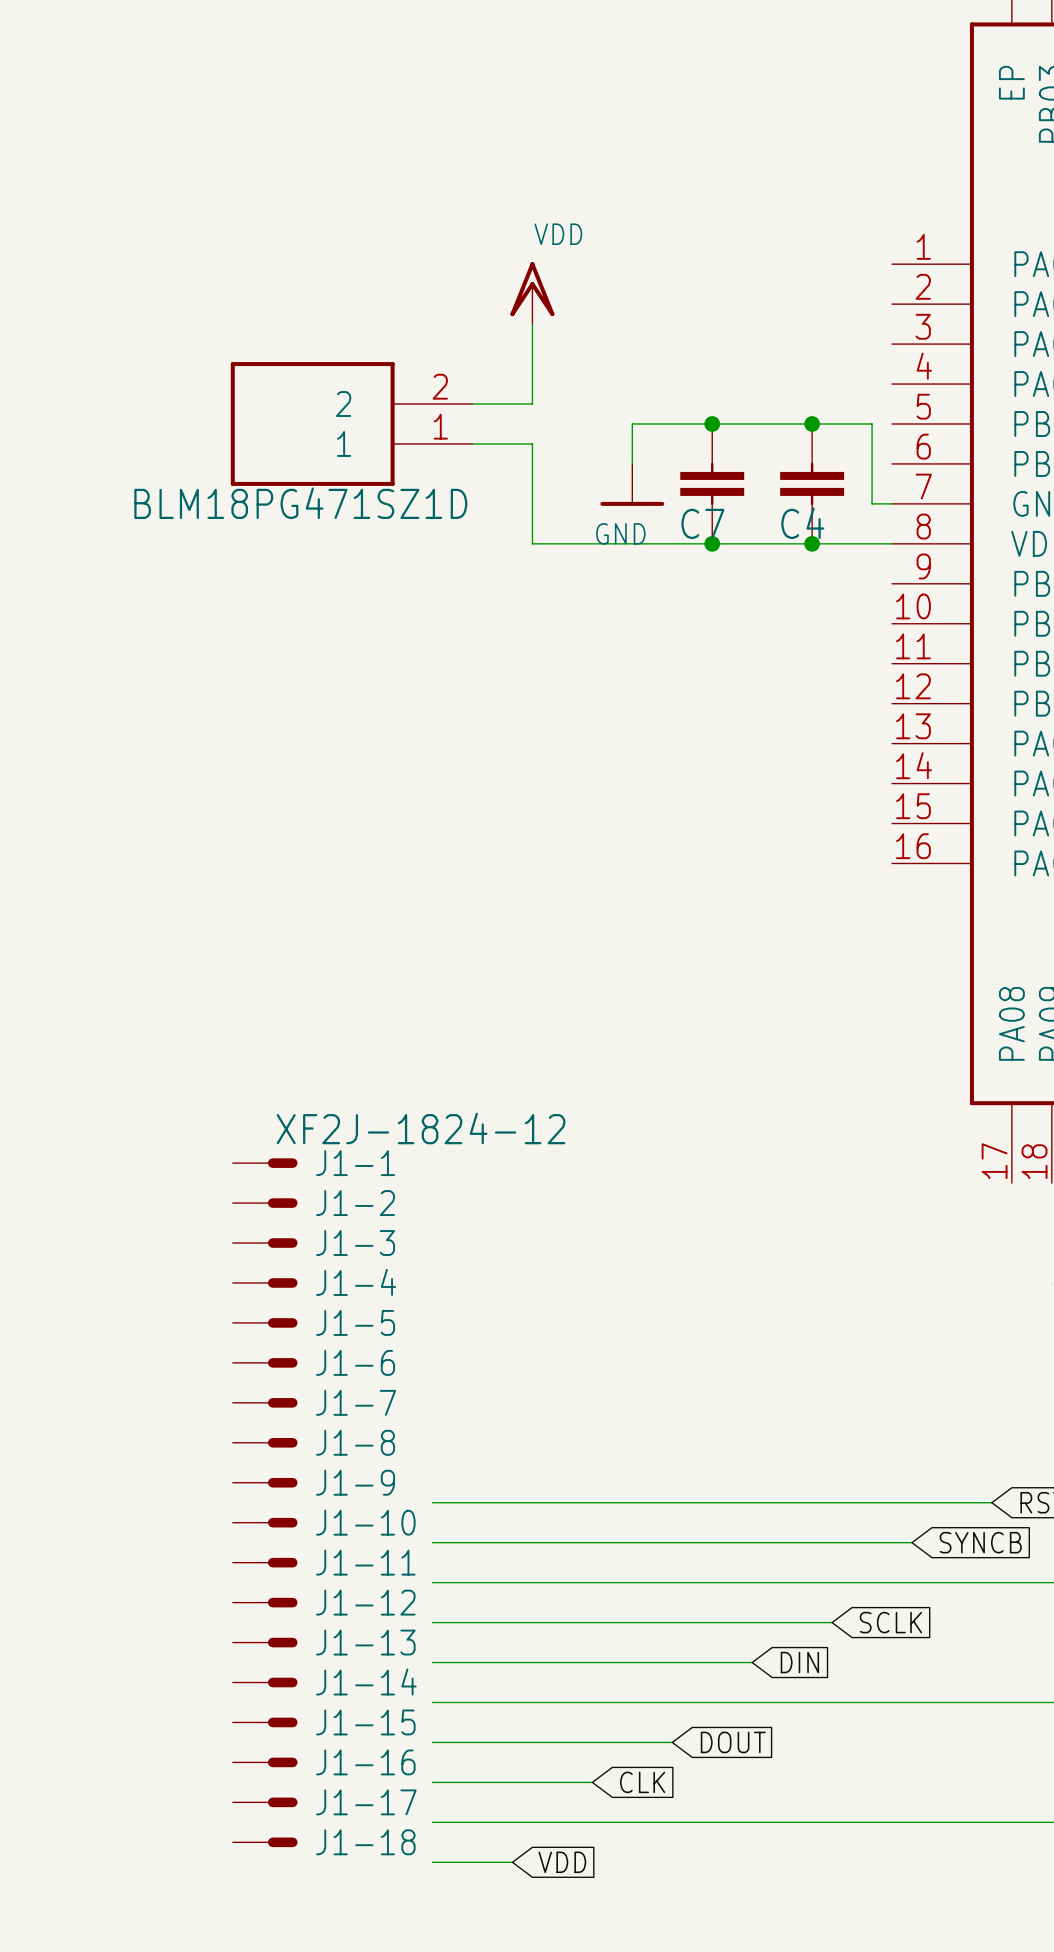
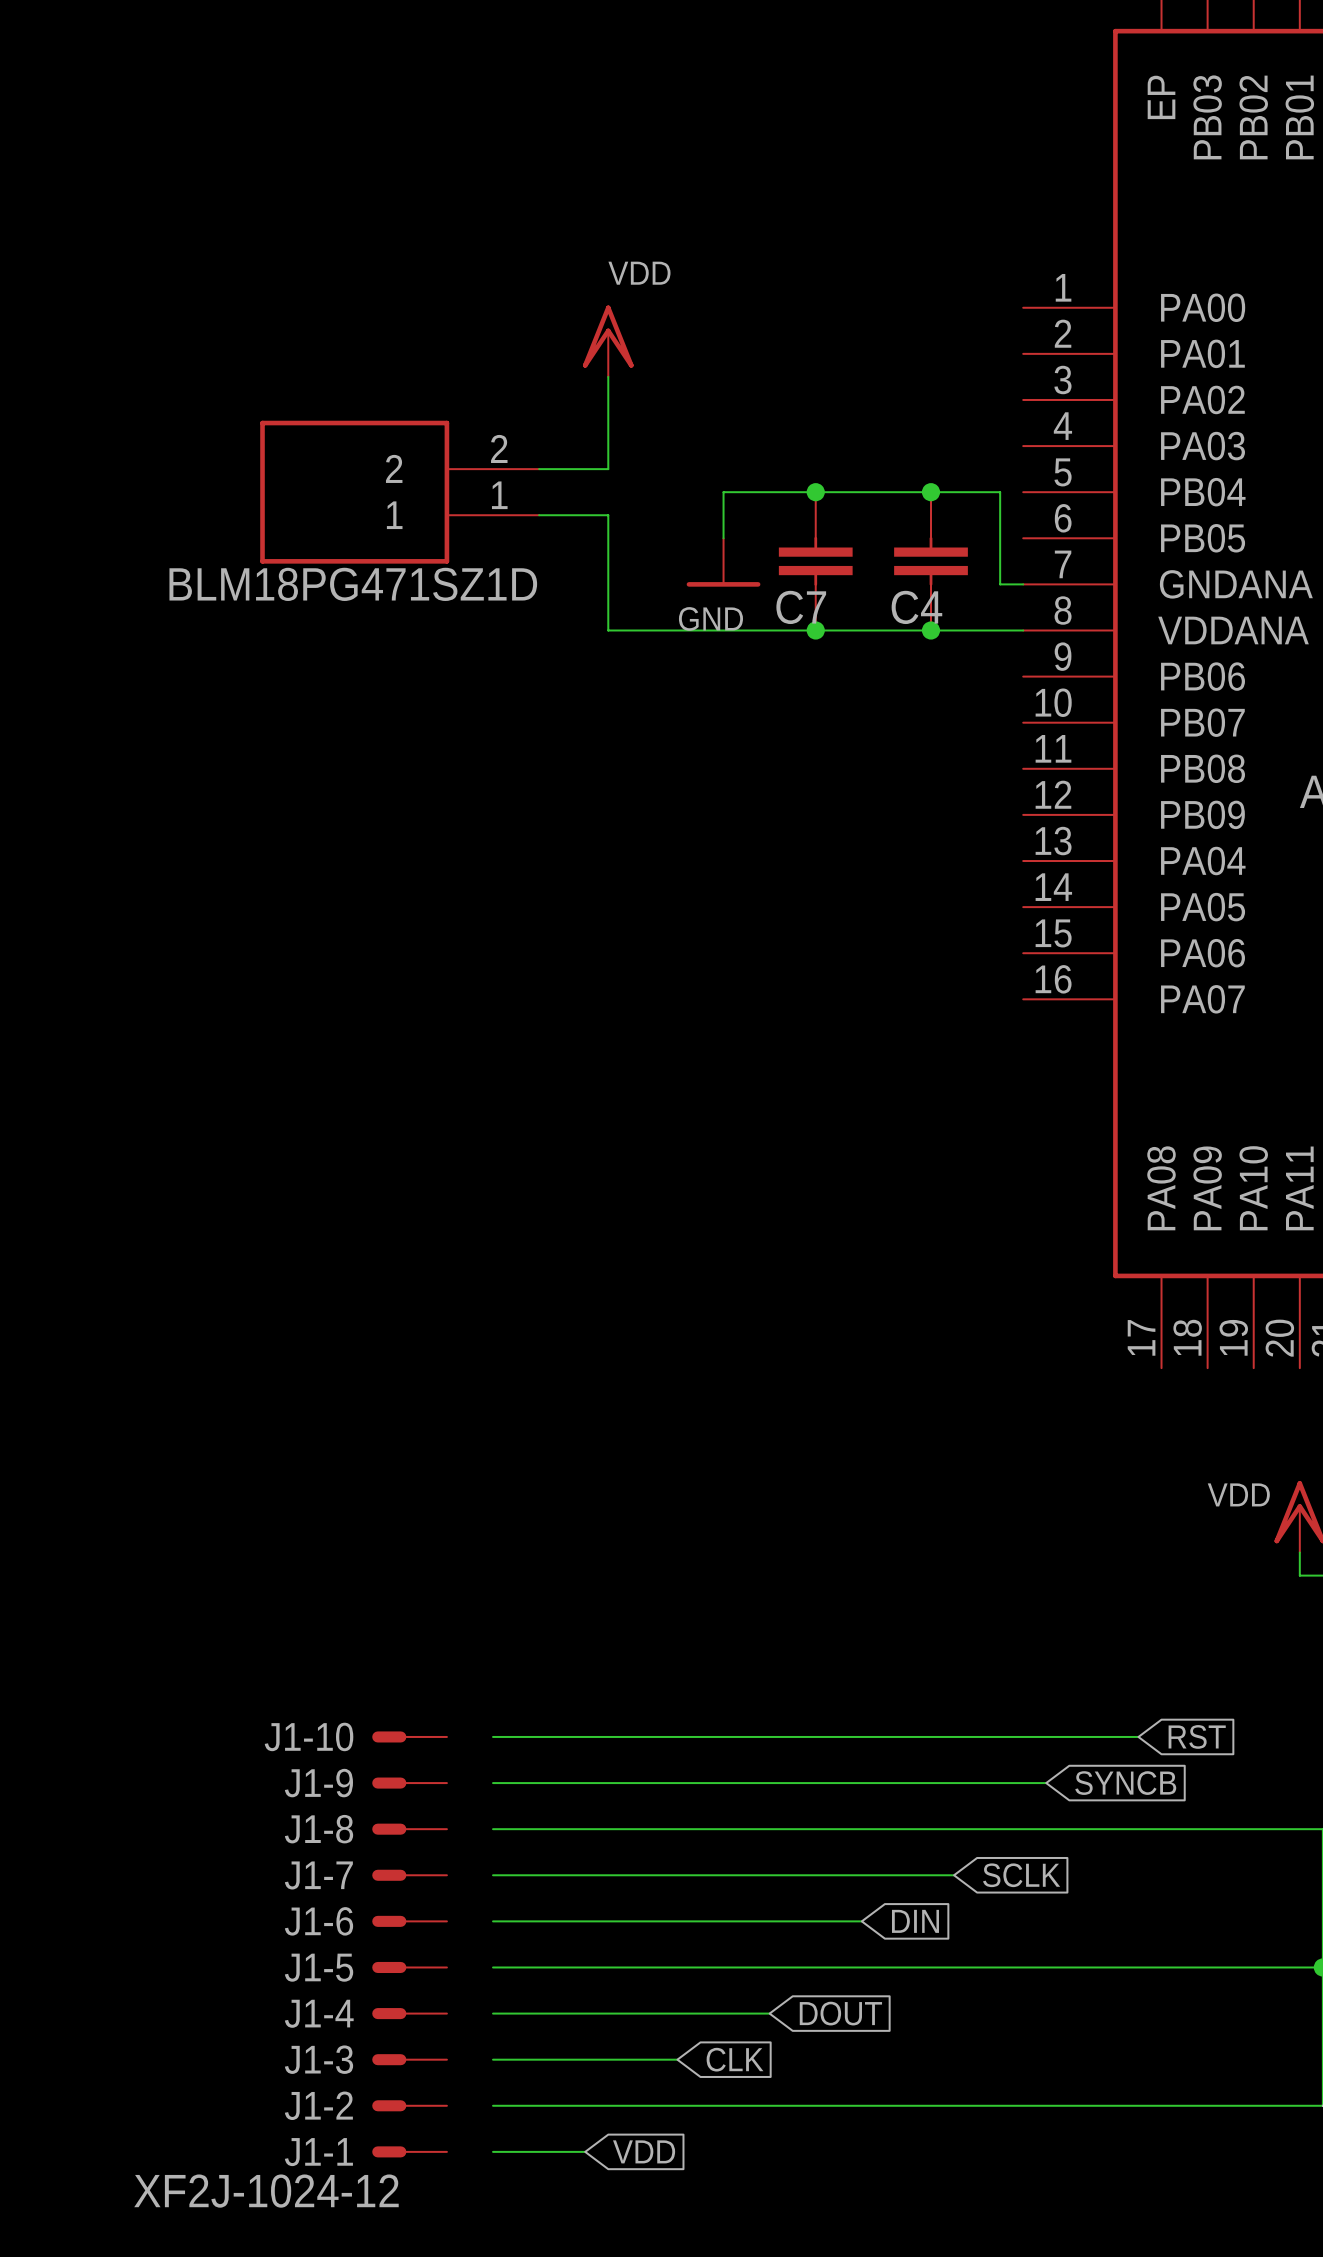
J1-1 value: XF2J-1824-12 (421, 1128) -> XF2J-1024-12 (266, 2191)
J1-1 position: (265, 1163) -> (409, 2151)
J1-1 rotation: 0° (282, 1163) -> 180° (389, 2151)
J1-2 position: (265, 1203) -> (409, 2105)
J1-2 rotation: 0° (282, 1203) -> 180° (389, 2105)
J1-3 position: (265, 1243) -> (409, 2059)
J1-3 rotation: 0° (282, 1243) -> 180° (389, 2059)
J1-4 position: (265, 1282) -> (409, 2013)
J1-4 rotation: 0° (282, 1282) -> 180° (389, 2013)
J1-5 position: (265, 1322) -> (409, 1967)
J1-5 rotation: 0° (282, 1322) -> 180° (389, 1967)
J1-6 position: (265, 1362) -> (409, 1921)
J1-6 rotation: 0° (282, 1362) -> 180° (389, 1921)
J1-7 position: (265, 1402) -> (409, 1875)
J1-7 rotation: 0° (282, 1402) -> 180° (389, 1875)
J1-8 position: (265, 1442) -> (409, 1829)
J1-8 rotation: 0° (282, 1442) -> 180° (389, 1829)
J1-9 position: (265, 1482) -> (409, 1783)
J1-9 rotation: 0° (282, 1482) -> 180° (389, 1783)
J1-10 position: (265, 1522) -> (409, 1736)
J1-10 rotation: 0° (282, 1522) -> 180° (389, 1736)
J1-11: (265, 1562) -> none
J1-12: (265, 1602) -> none
J1-13: (265, 1642) -> none
J1-14: (265, 1682) -> none
J1-15: (265, 1722) -> none
J1-16: (265, 1762) -> none
J1-17: (265, 1802) -> none
J1-18: (265, 1842) -> none

